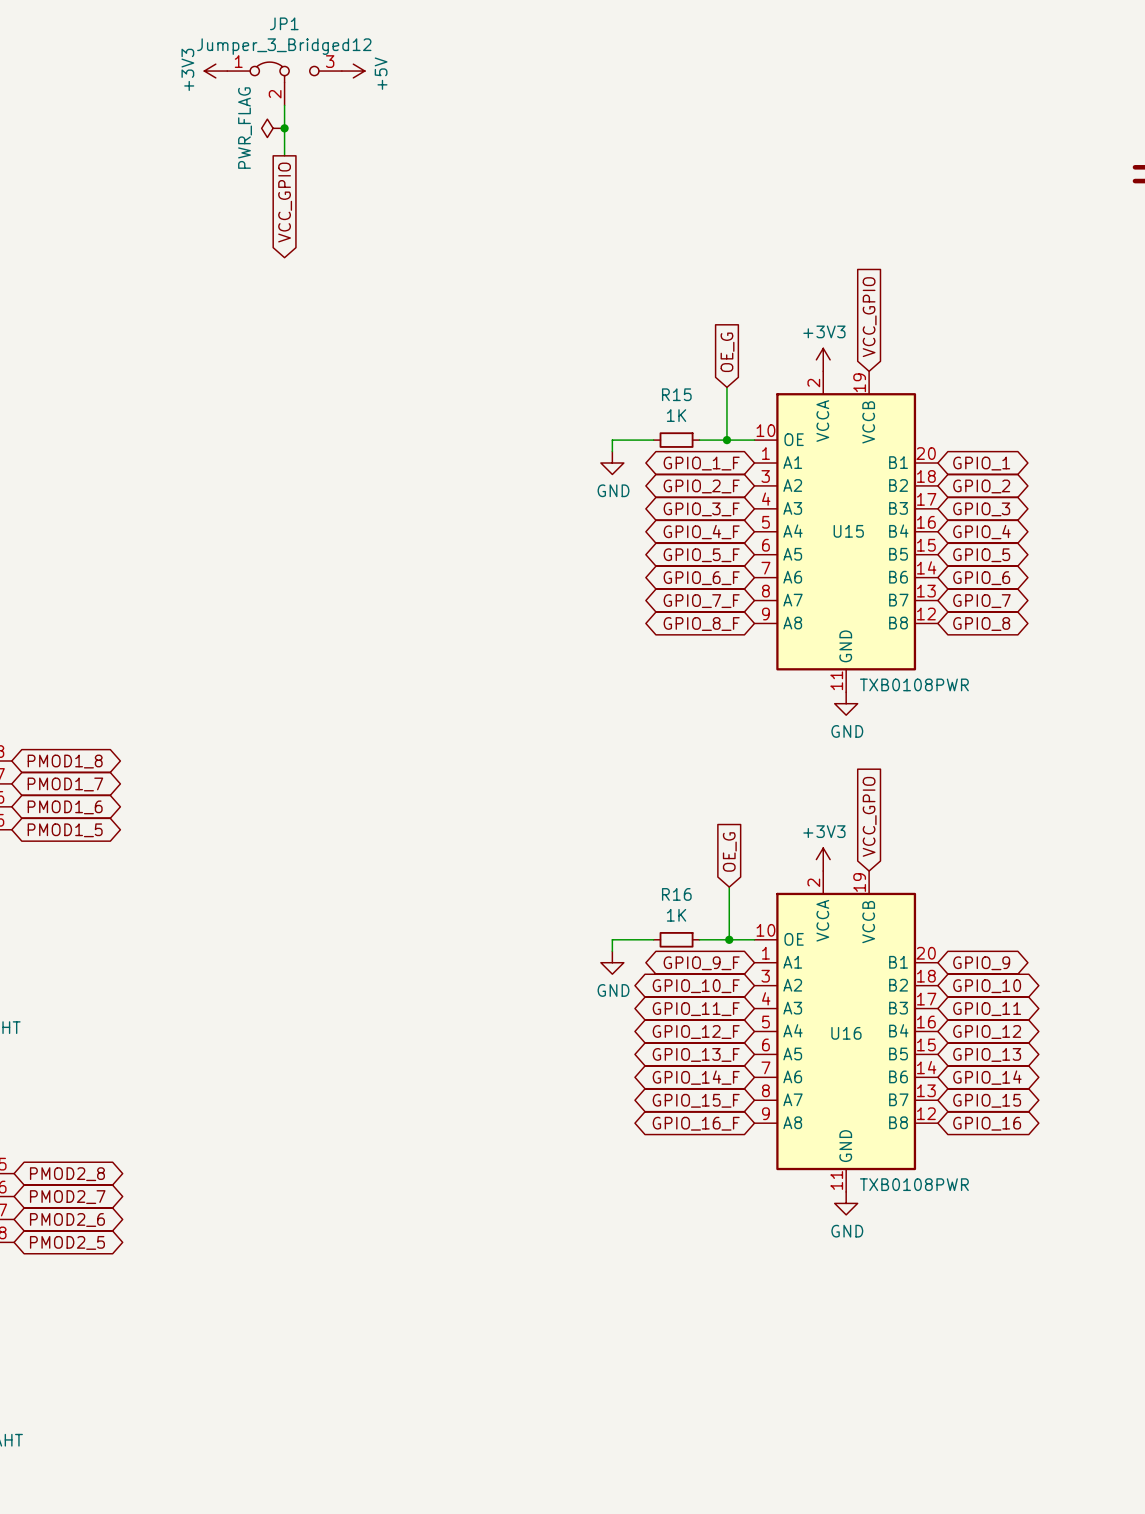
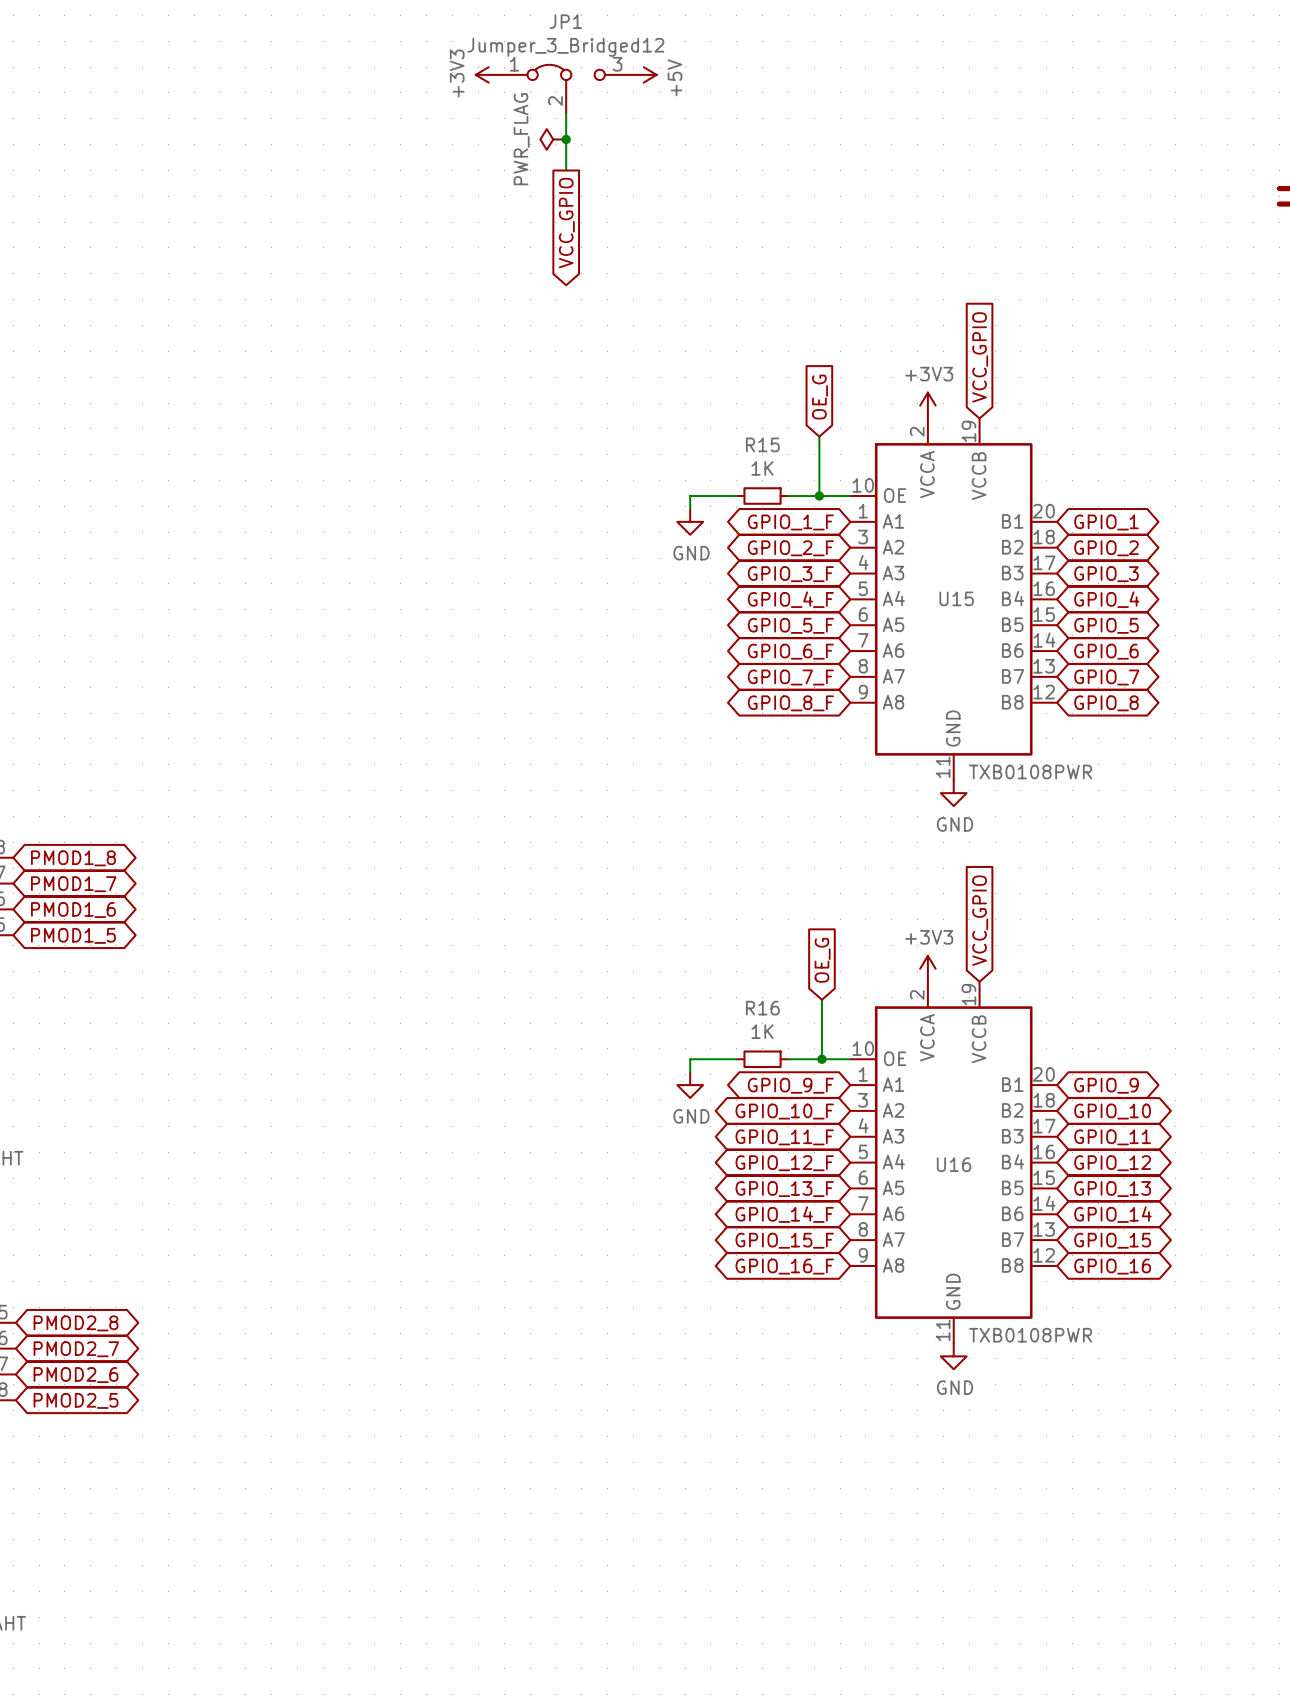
power symbol position: +3V3 (215, 71) -> +3V3 (488, 74)
power symbol position: +5V (353, 71) -> +5V (643, 74)
JP1 position: (284, 83) -> (566, 89)
wire: (284, 105) (284, 155) -> (566, 113) (566, 170)
junction: none -> (566, 139)
power symbol position: PWR_FLAG (273, 128) -> PWR_FLAG (553, 139)
junction: (284, 128) -> none
global label position: VCC_GPIO (285, 202) -> VCC_GPIO (566, 223)

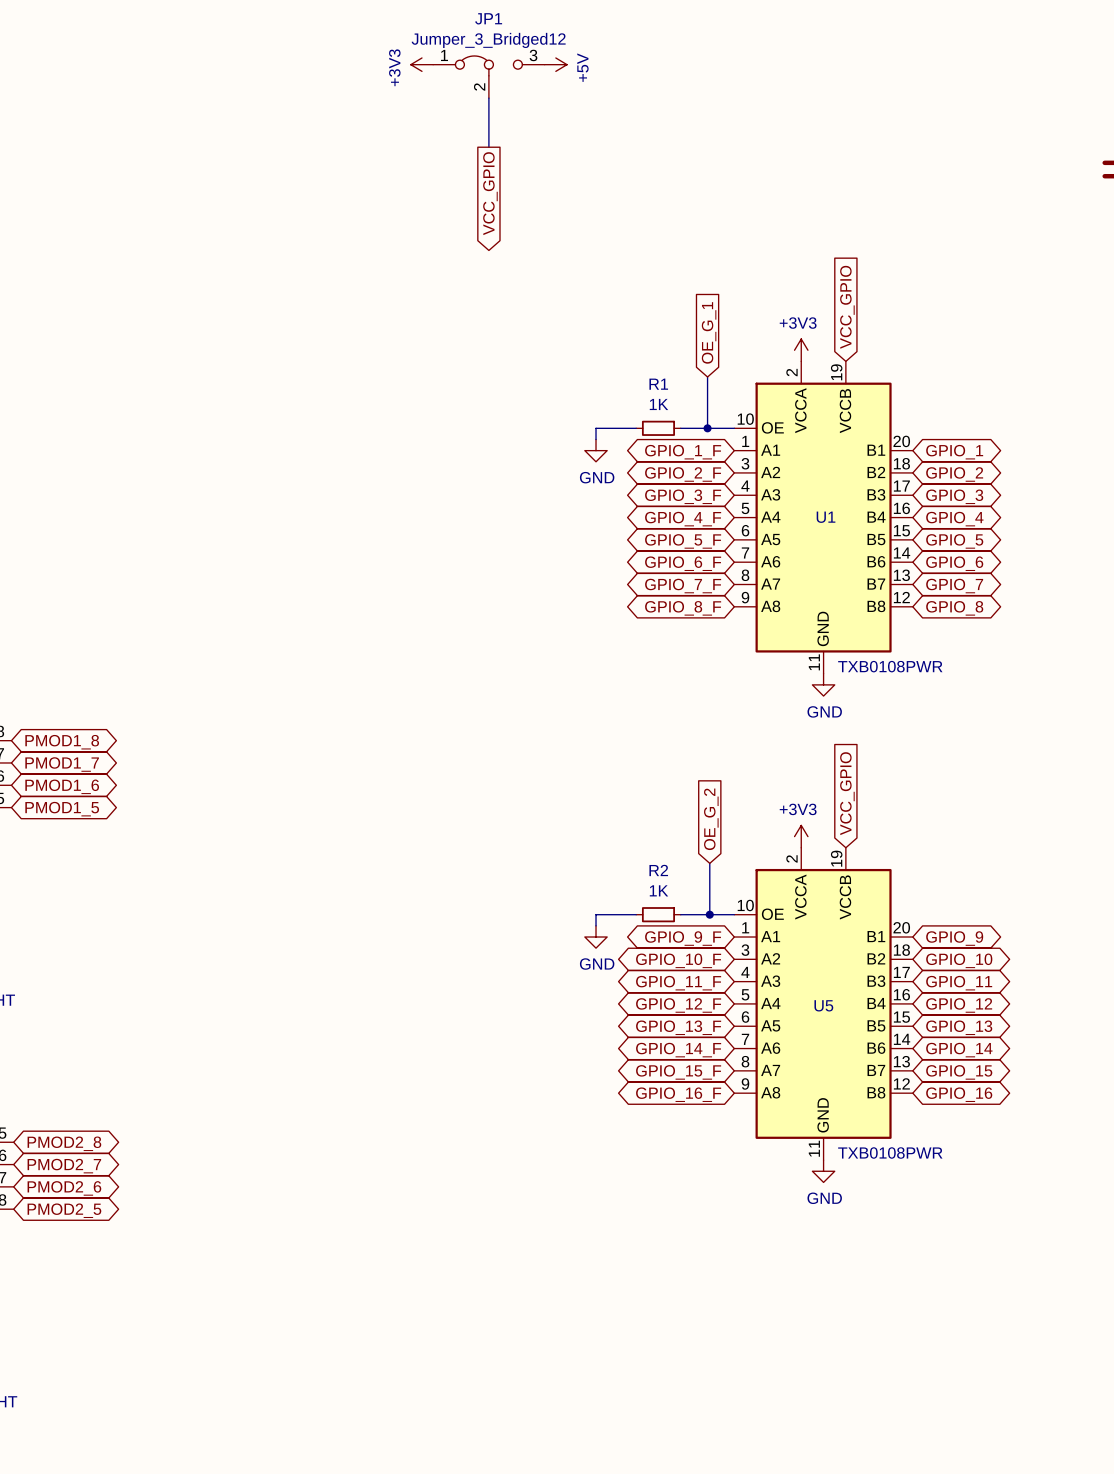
power symbol: PWR_FLAG (553, 139) -> none
junction: (566, 139) -> none
global label: OE_G (819, 397) -> OE_G_1 (709, 332)
R15 name: R15 (762, 444) -> R1 (658, 384)
U15 name: U15 (956, 598) -> U1 (826, 517)
global label: OE_G (822, 960) -> OE_G_2 (711, 819)
R16 name: R16 (762, 1008) -> R2 (658, 870)
U16 name: U16 (954, 1164) -> U5 (823, 1005)

